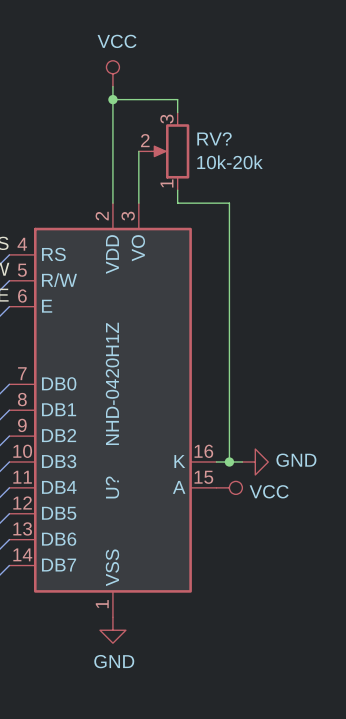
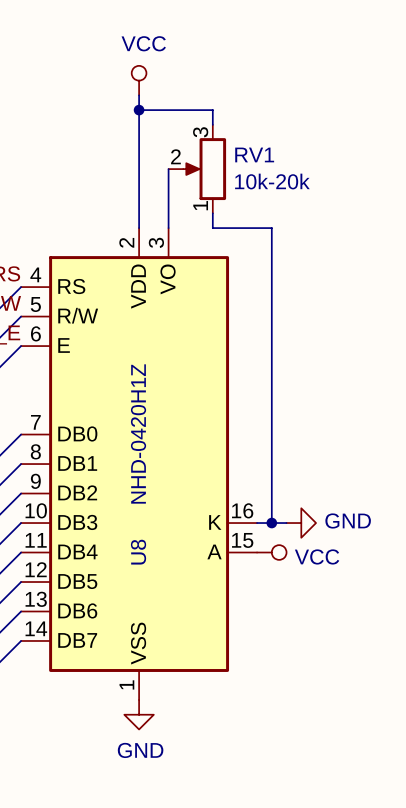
RV? name: RV? (214, 138) -> RV1 (254, 154)
U? name: U? (112, 487) -> U8 (138, 552)

